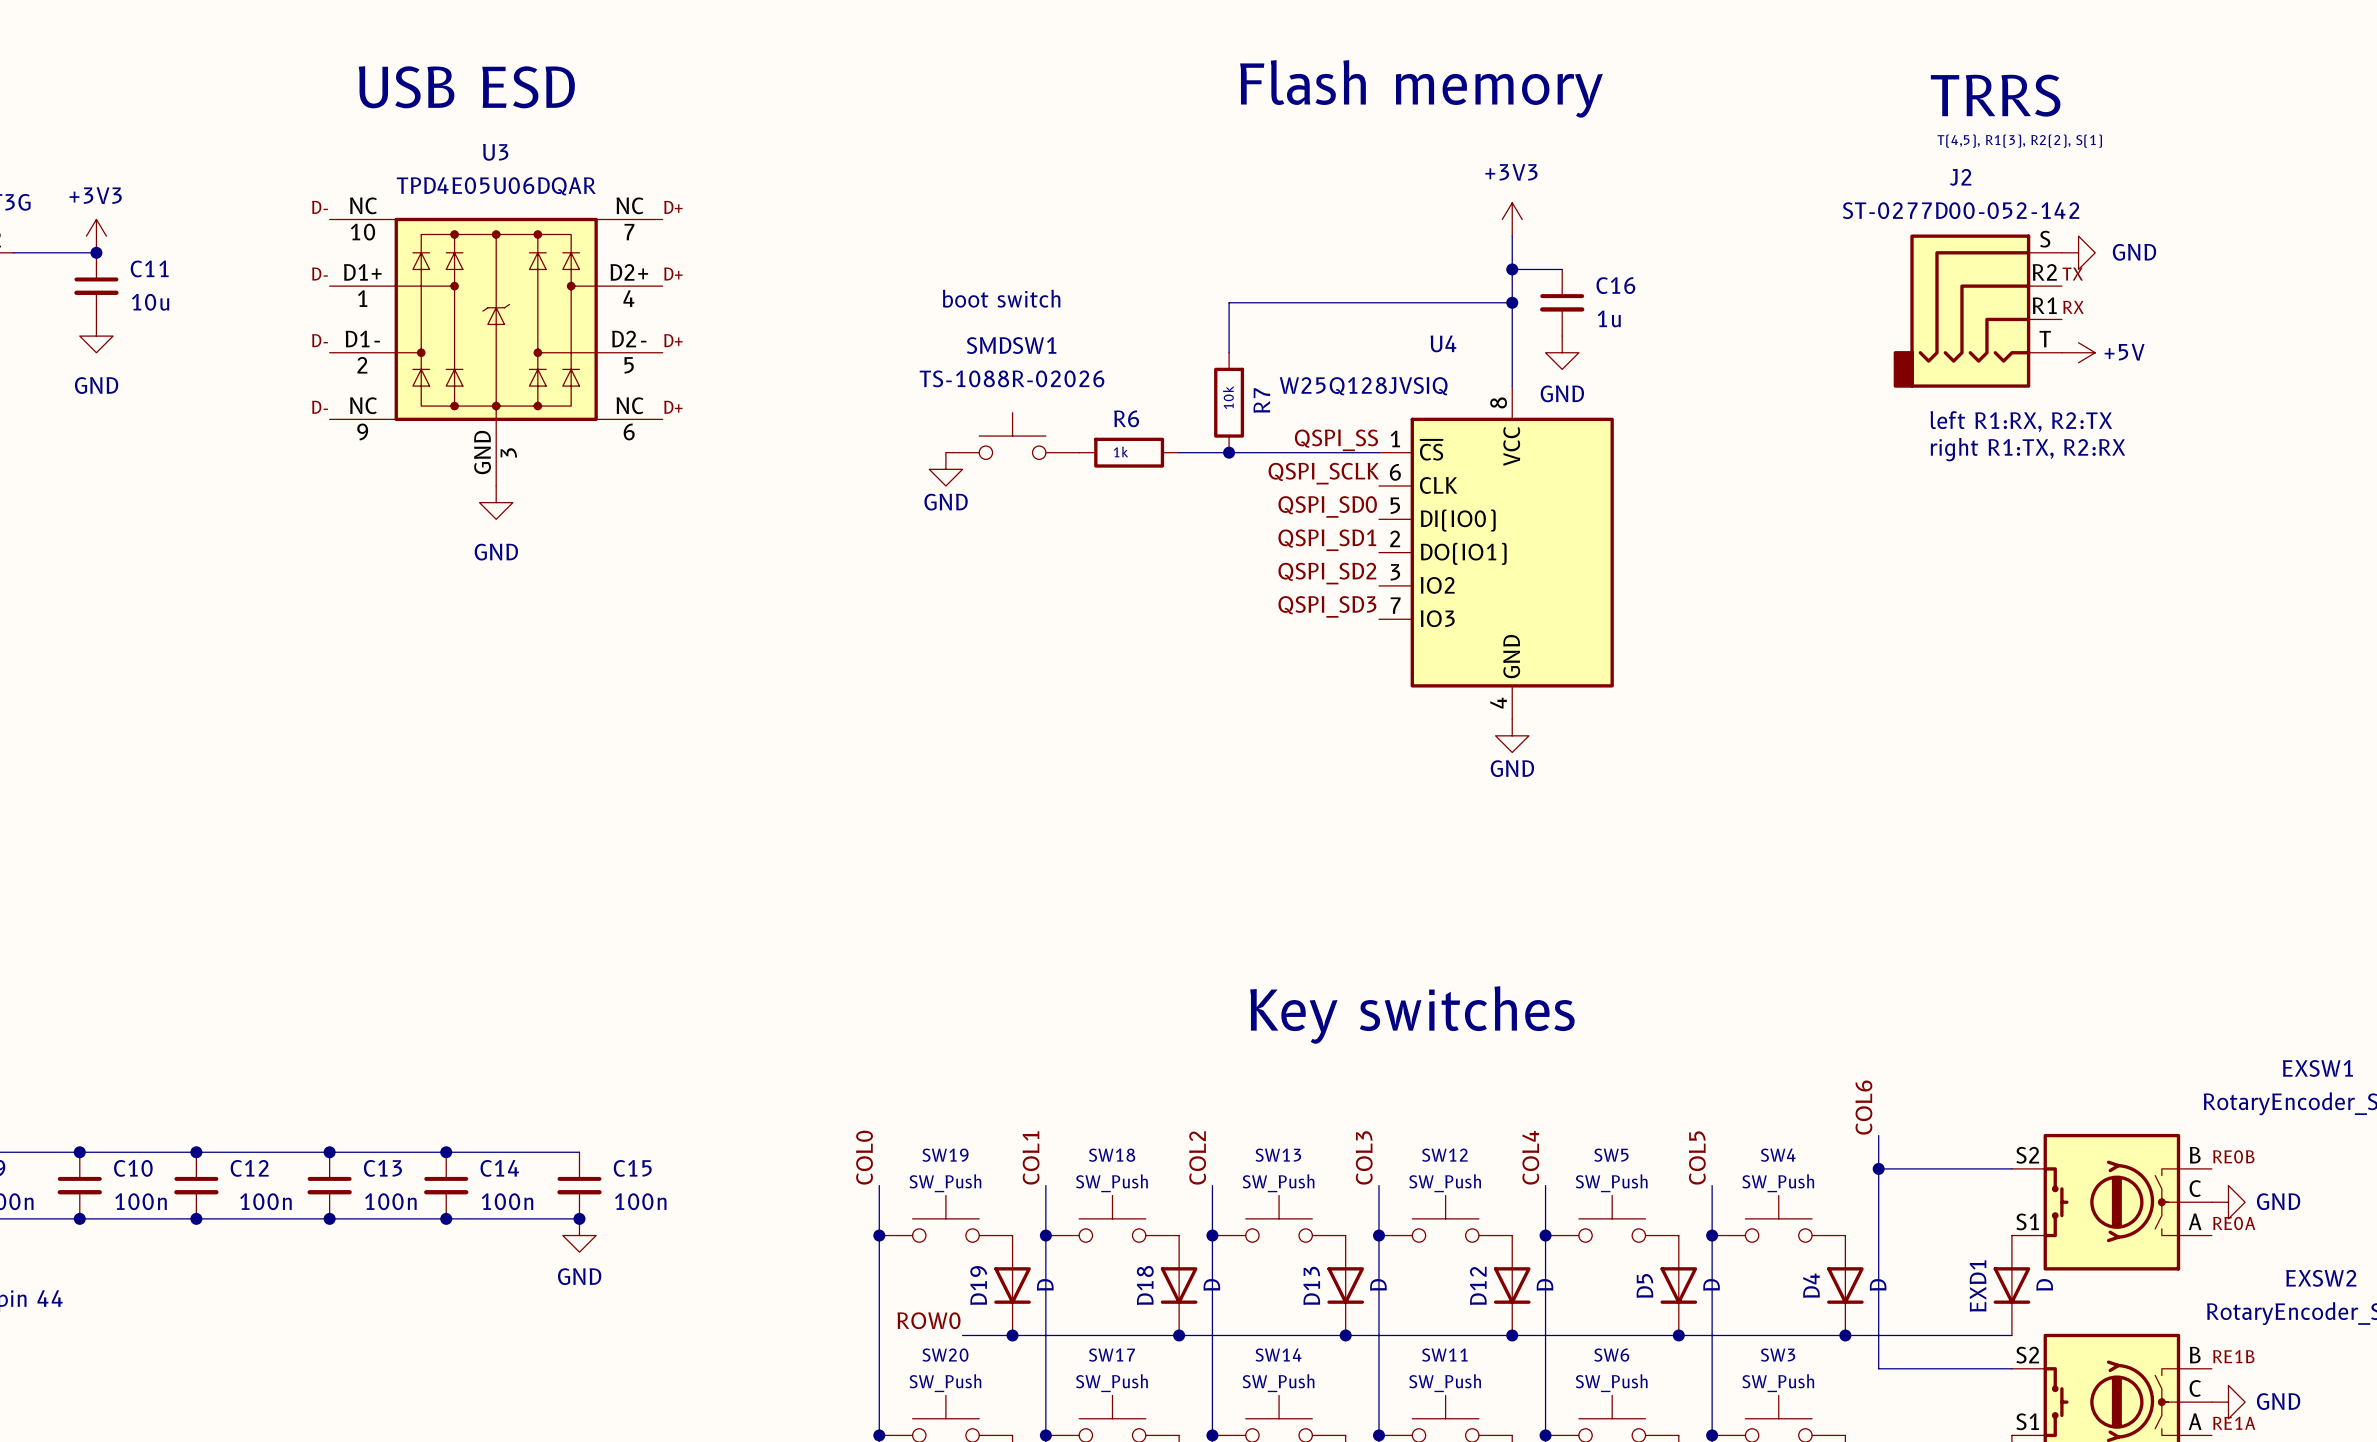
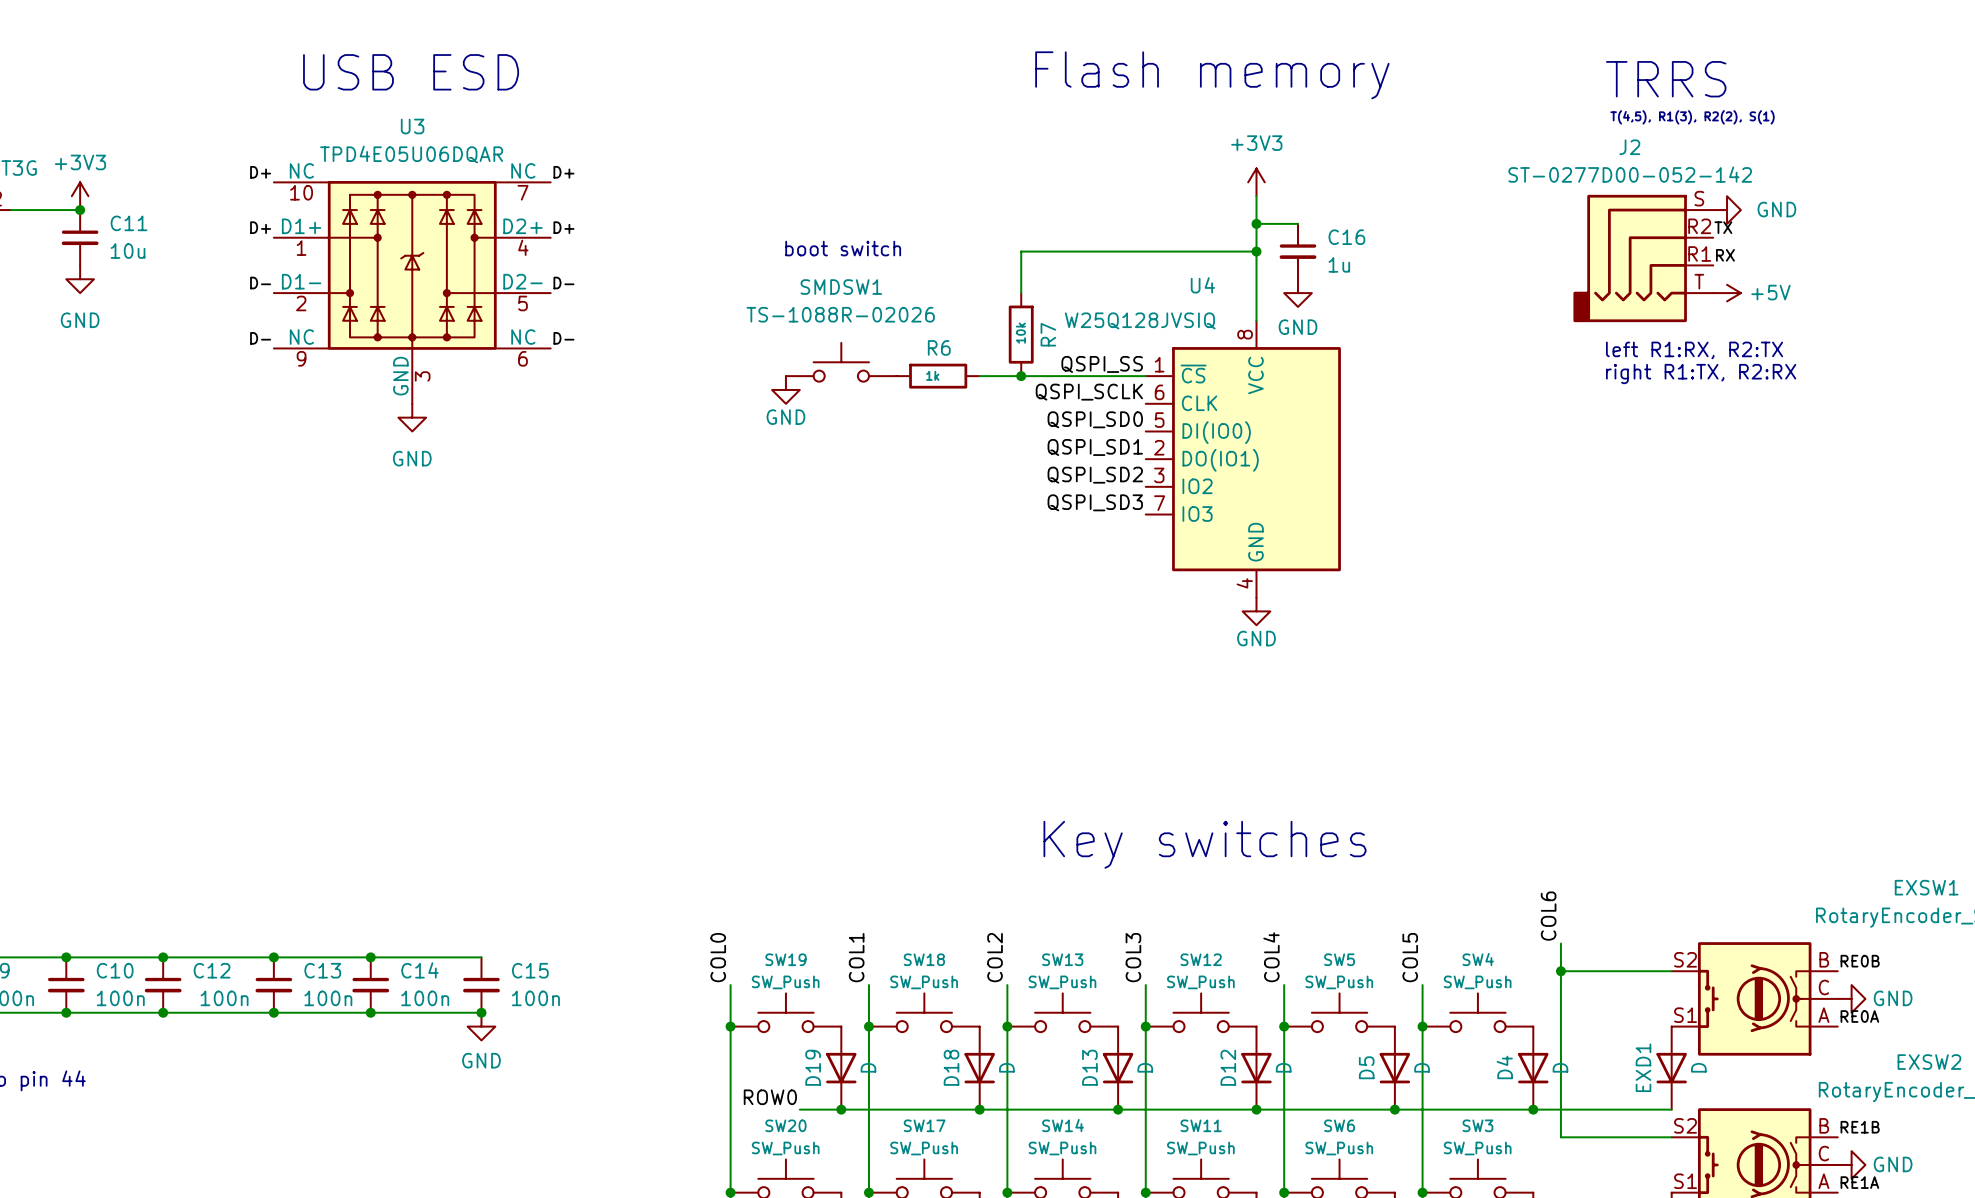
label: D- (320, 207) -> D+ (260, 172)
label: D- (320, 274) -> D+ (260, 227)
label: D+ (673, 340) -> D- (563, 283)
label: D+ (673, 407) -> D- (563, 338)

